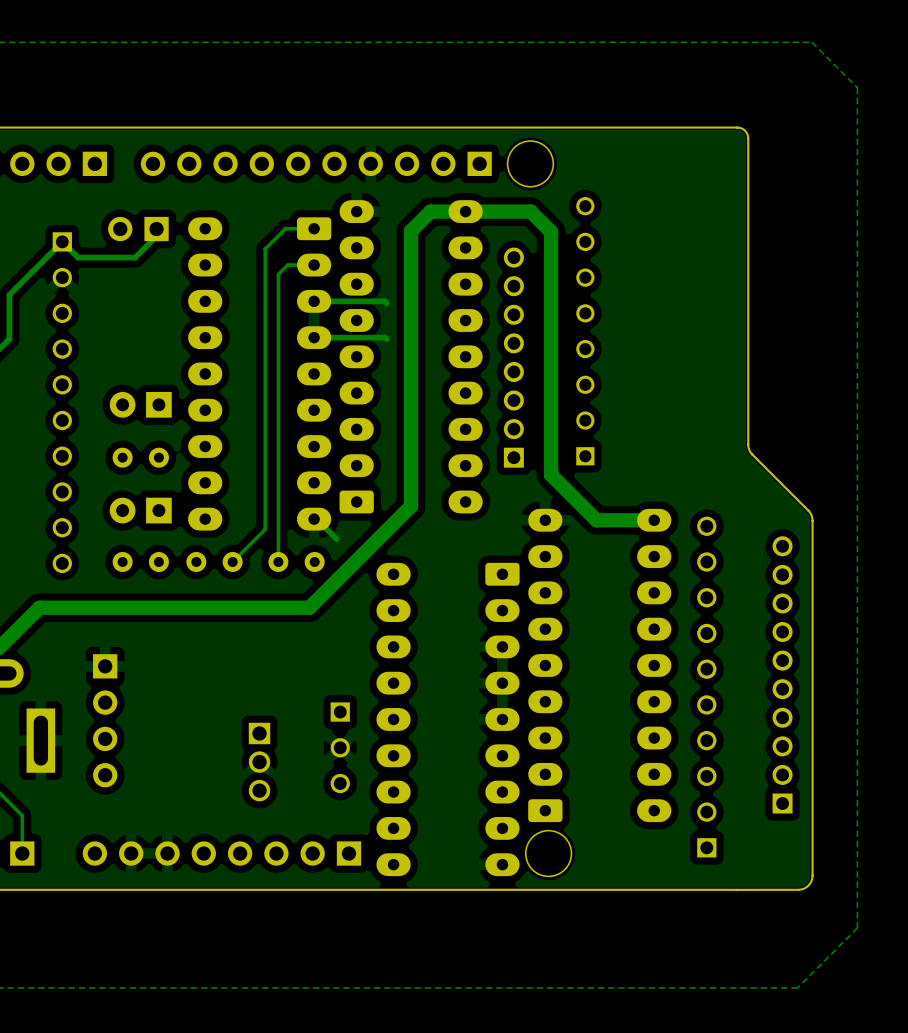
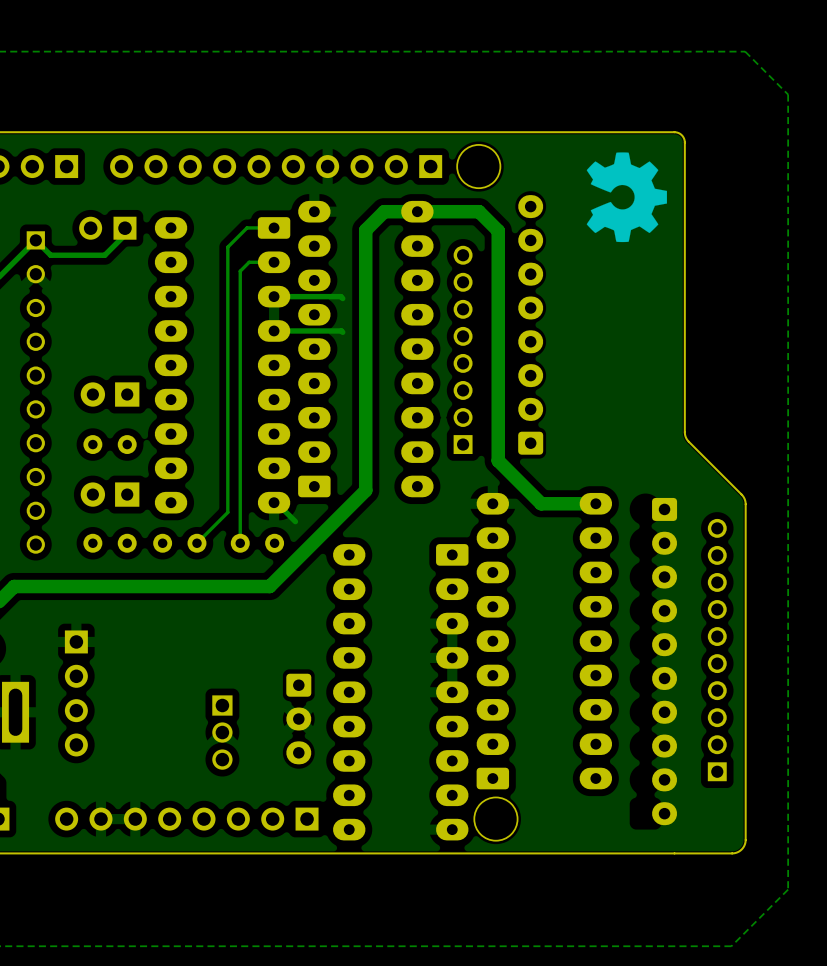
drawing: none -> [586, 152, 667, 243]
part footprint: [576, 197, 595, 466] -> [518, 195, 544, 455]
part: (706, 687) -> none
part: none -> (664, 661)
part footprint: [330, 702, 350, 794] -> [286, 673, 312, 765]

